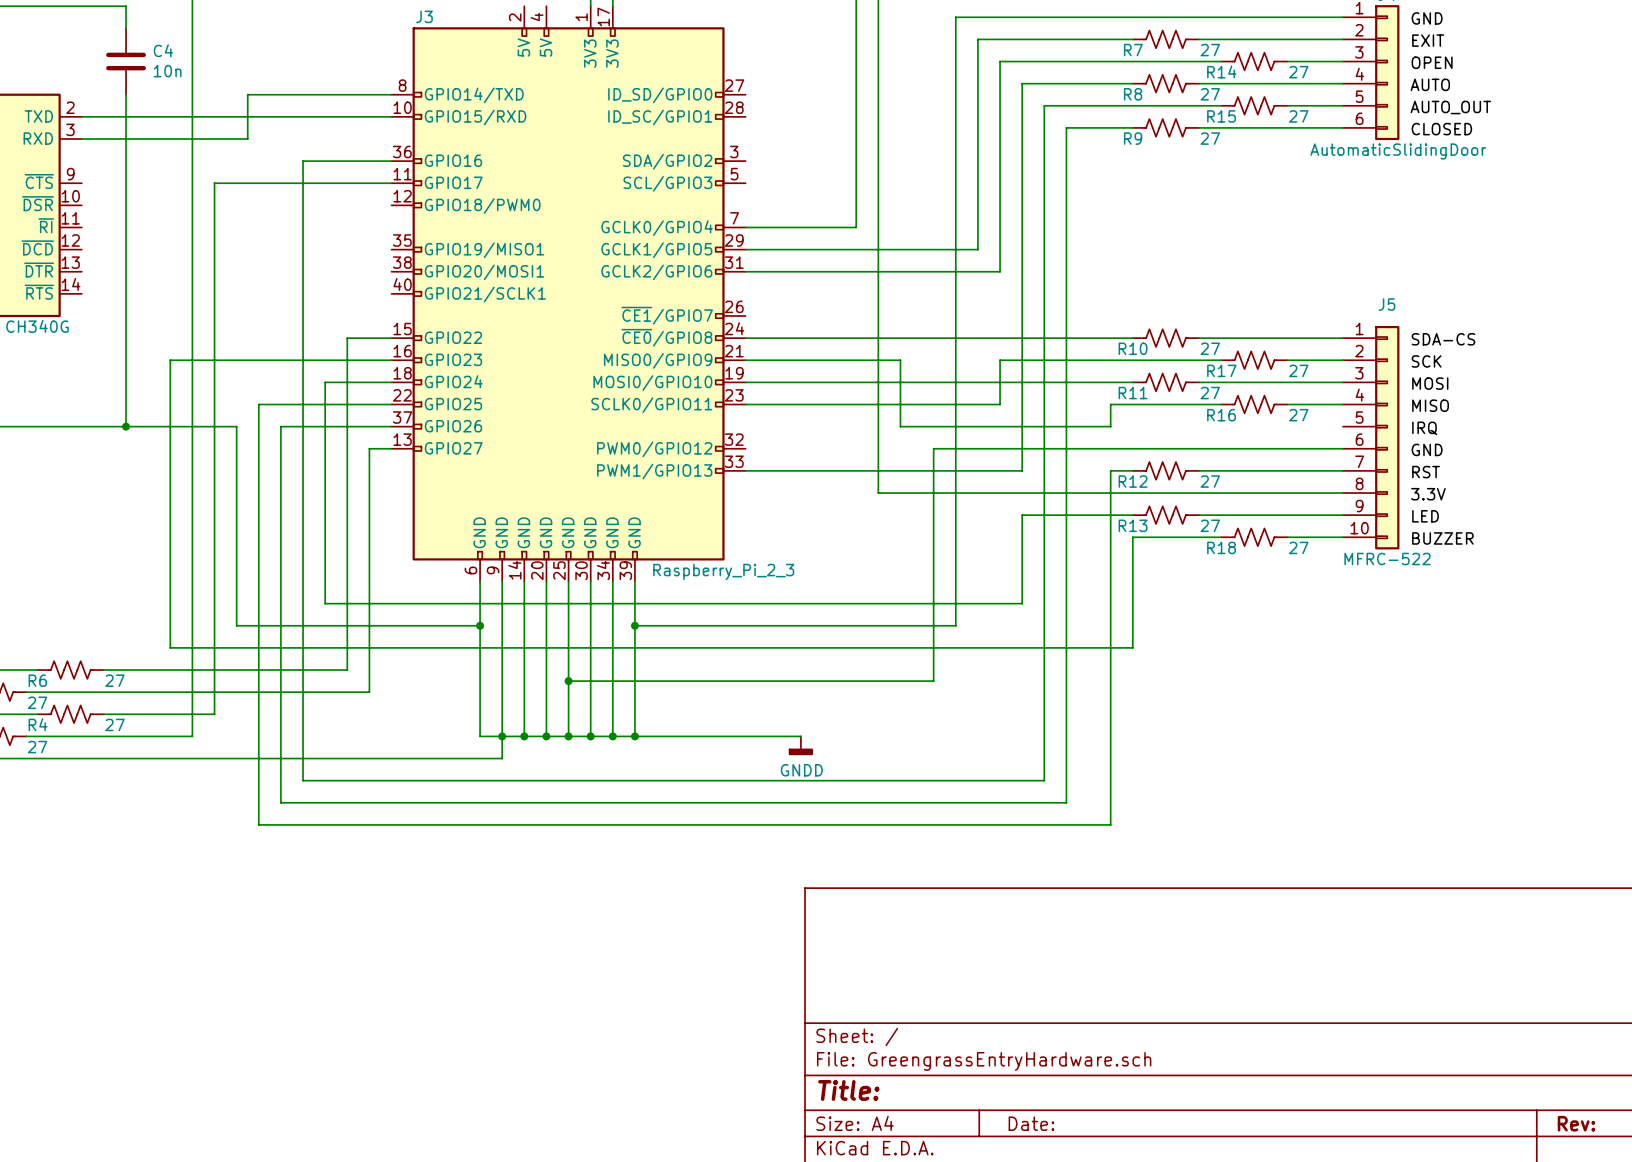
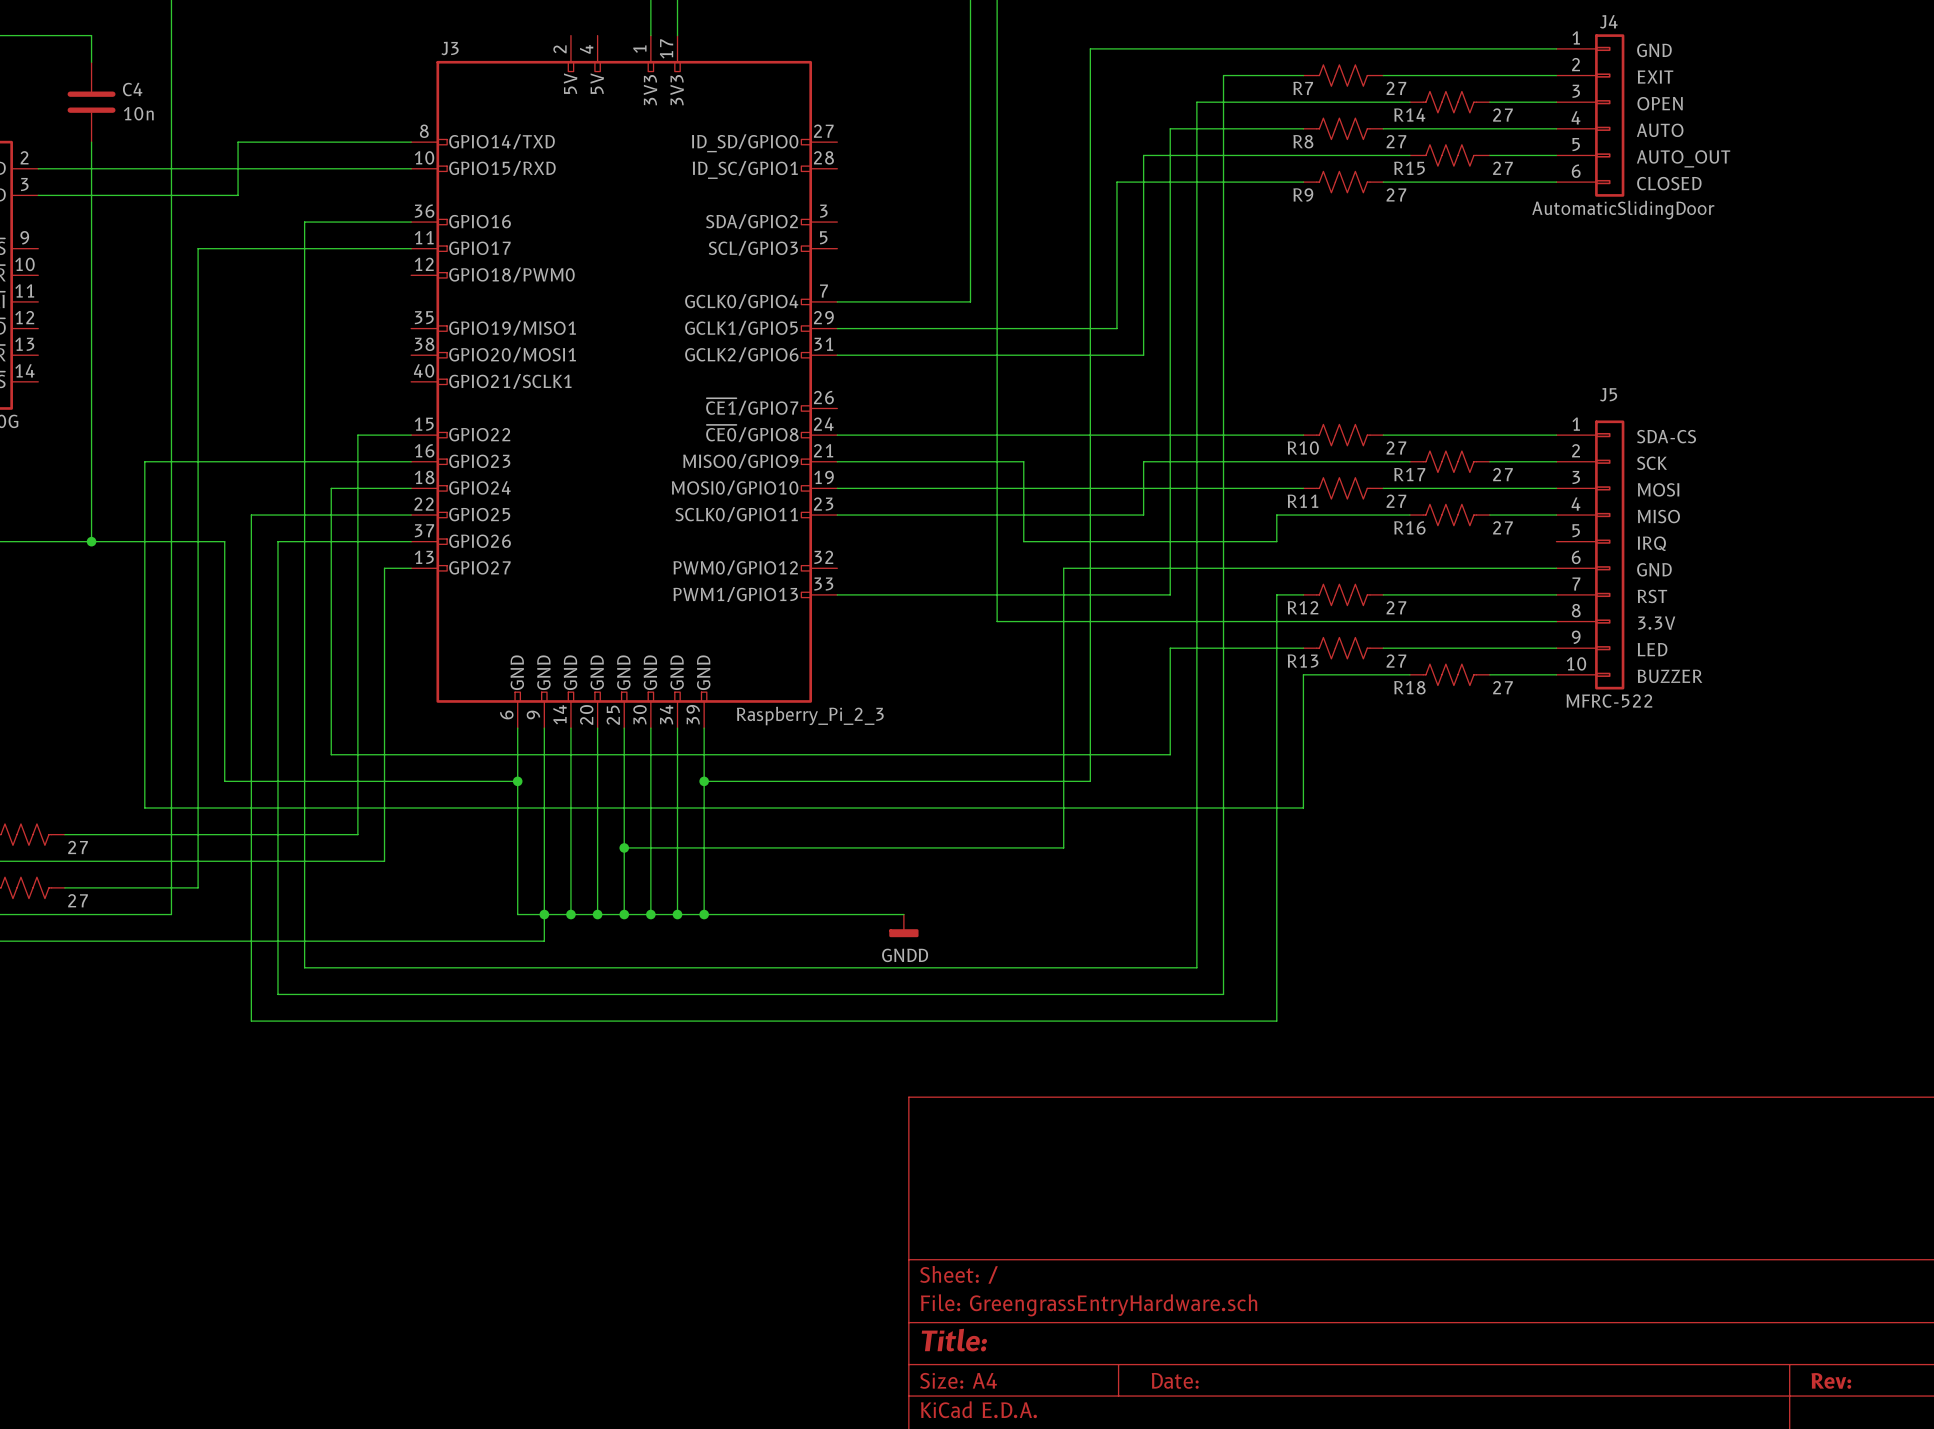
wire: (1066, 39) (977, 39) (977, 127) -> (1223, 75) (1223, 182) (1116, 182)
wire: (1044, 61) (1000, 61) (1000, 105) -> (1196, 102) (1196, 155) (1143, 155)

